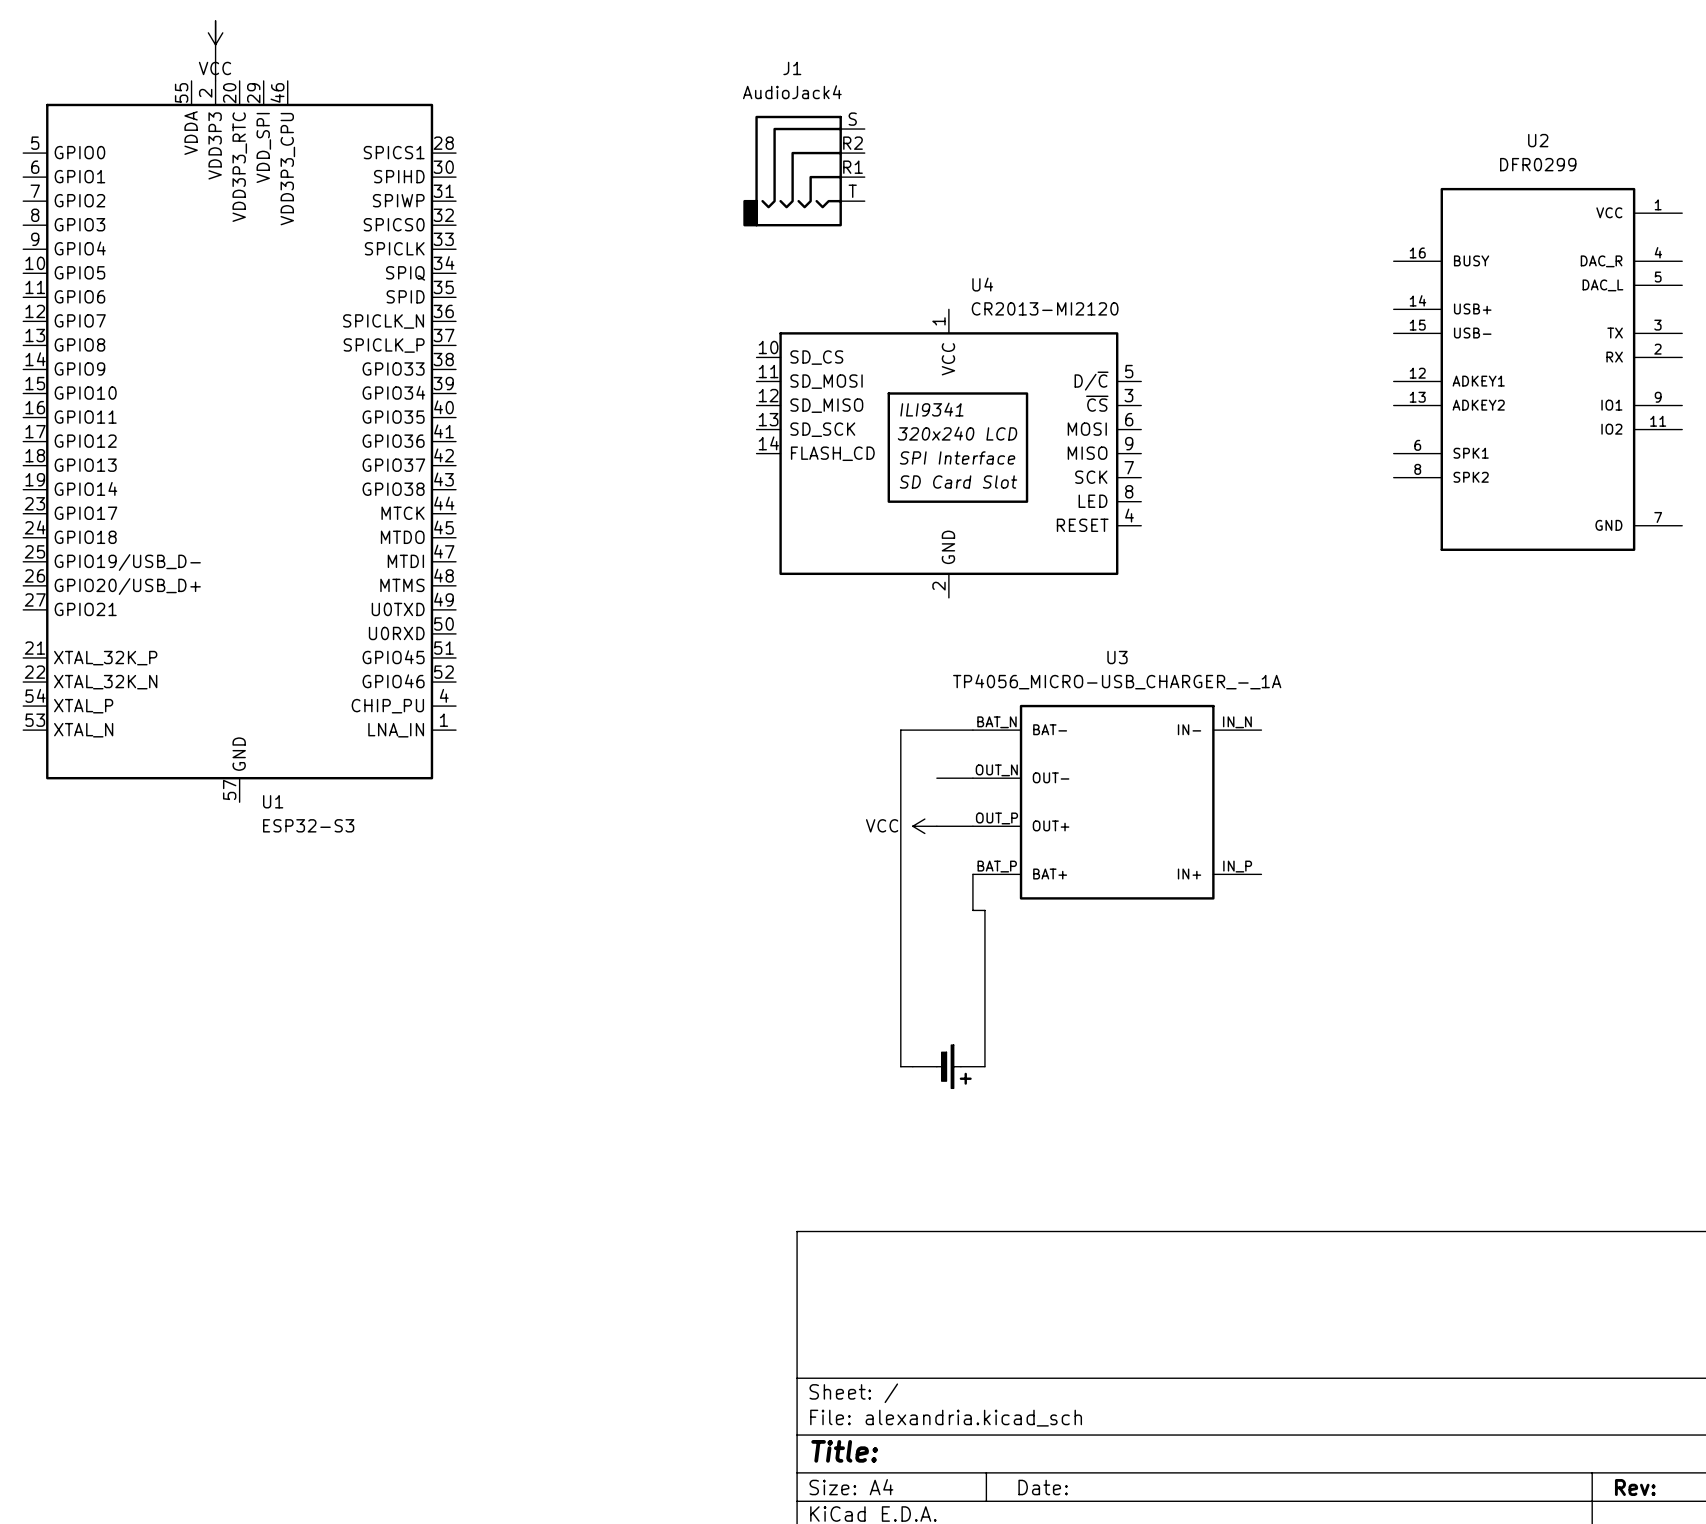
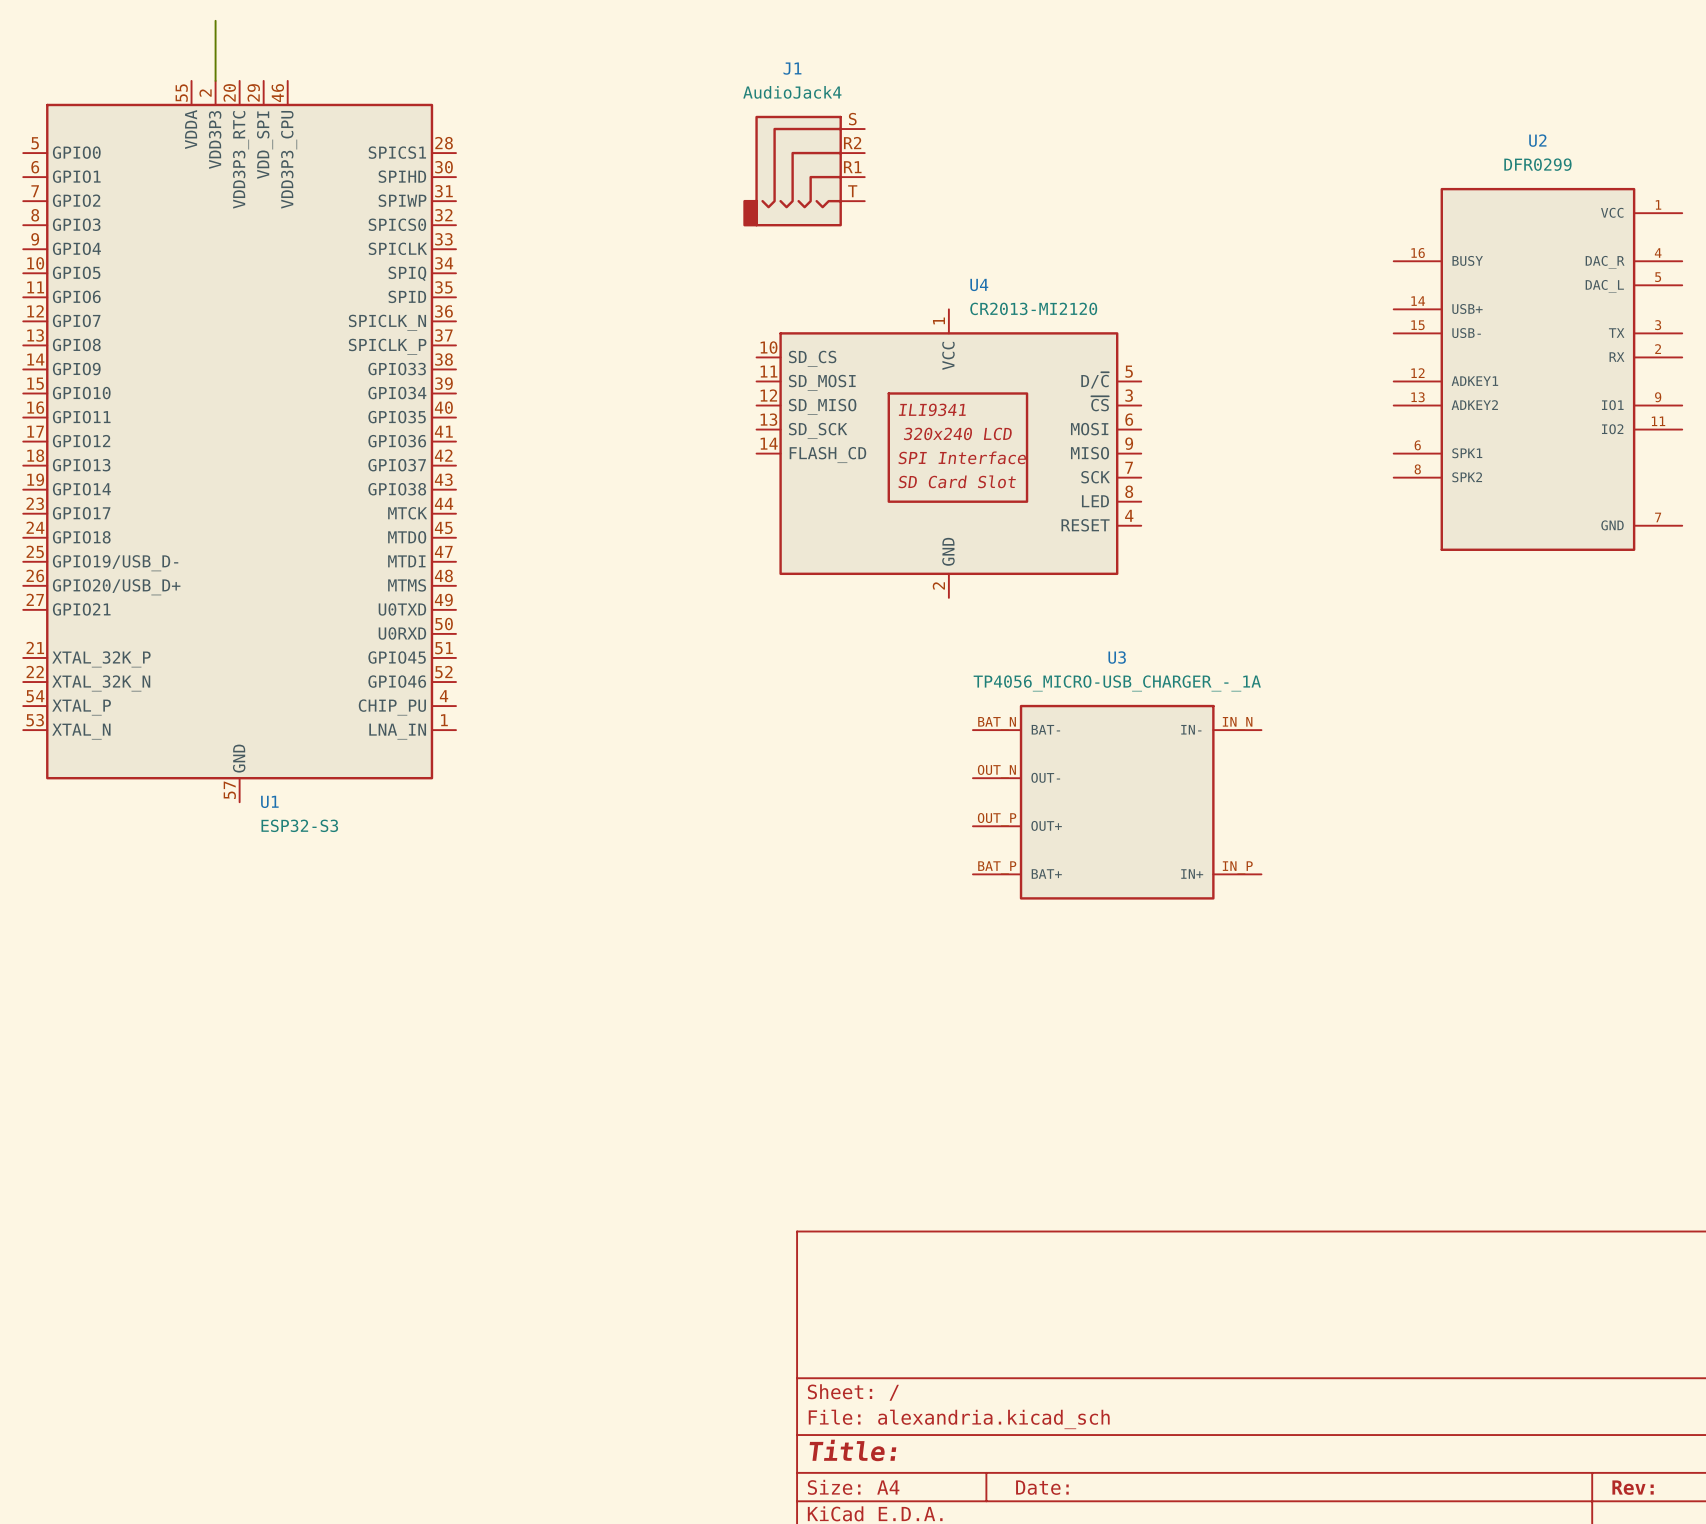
power symbol: VCC (215, 32) -> none
wire: (972, 730) (900, 730) (900, 1066) (912, 1066) -> none
wire: (936, 778) (972, 778) -> none
power symbol: VCC (924, 826) -> none
wire: (936, 826) (972, 826) -> none
wire: (972, 874) (972, 910) (984, 910) (984, 1066) -> none
part: (948, 1066) -> none

